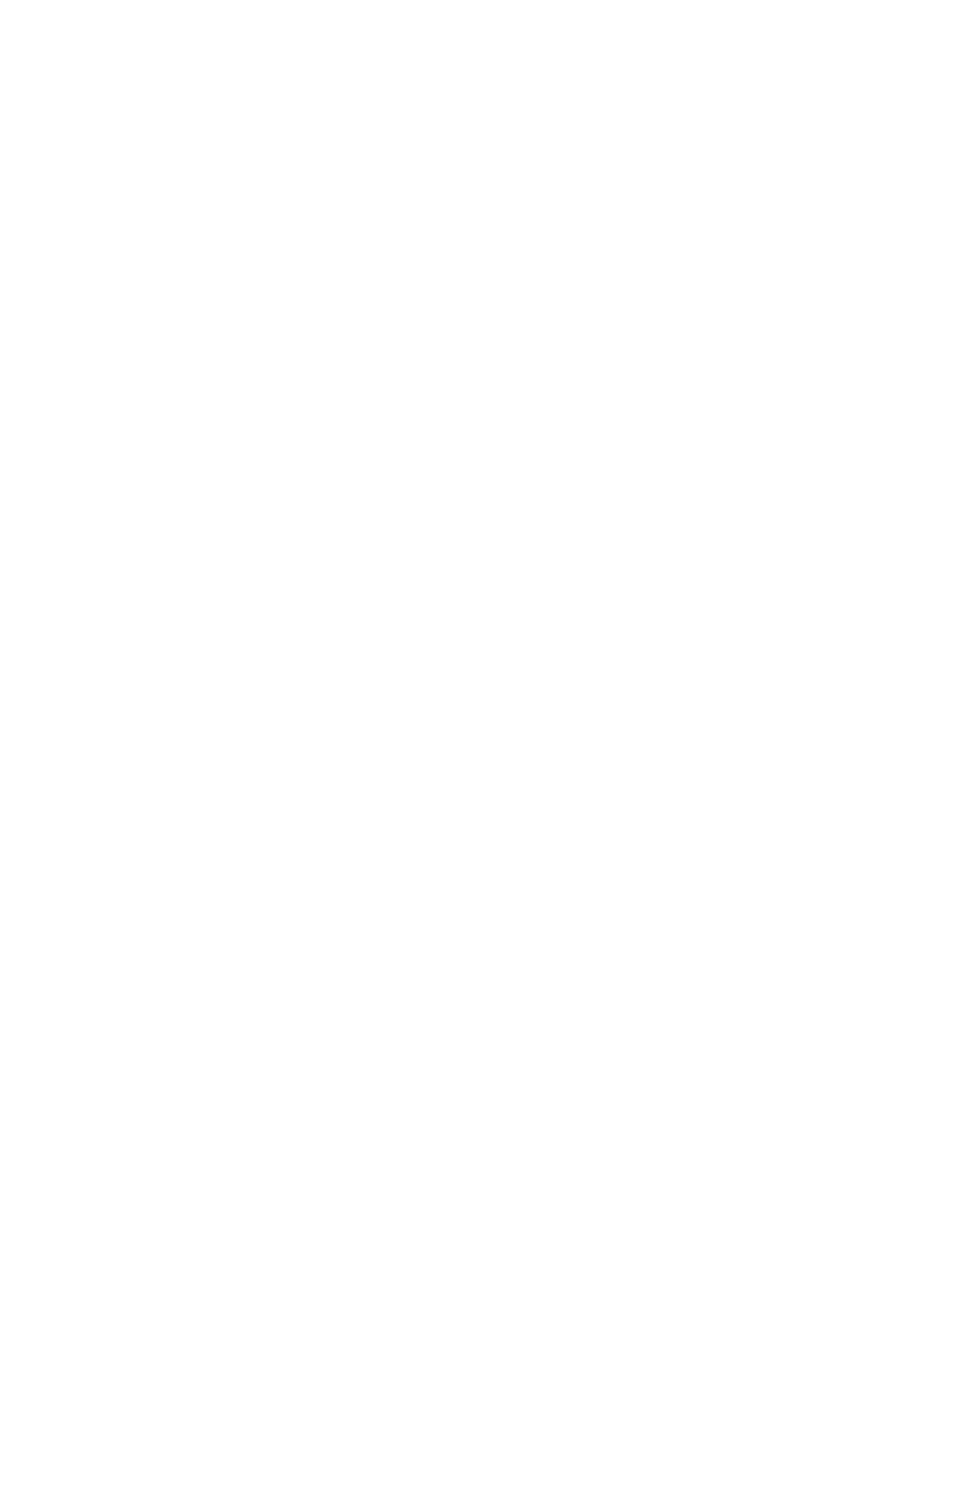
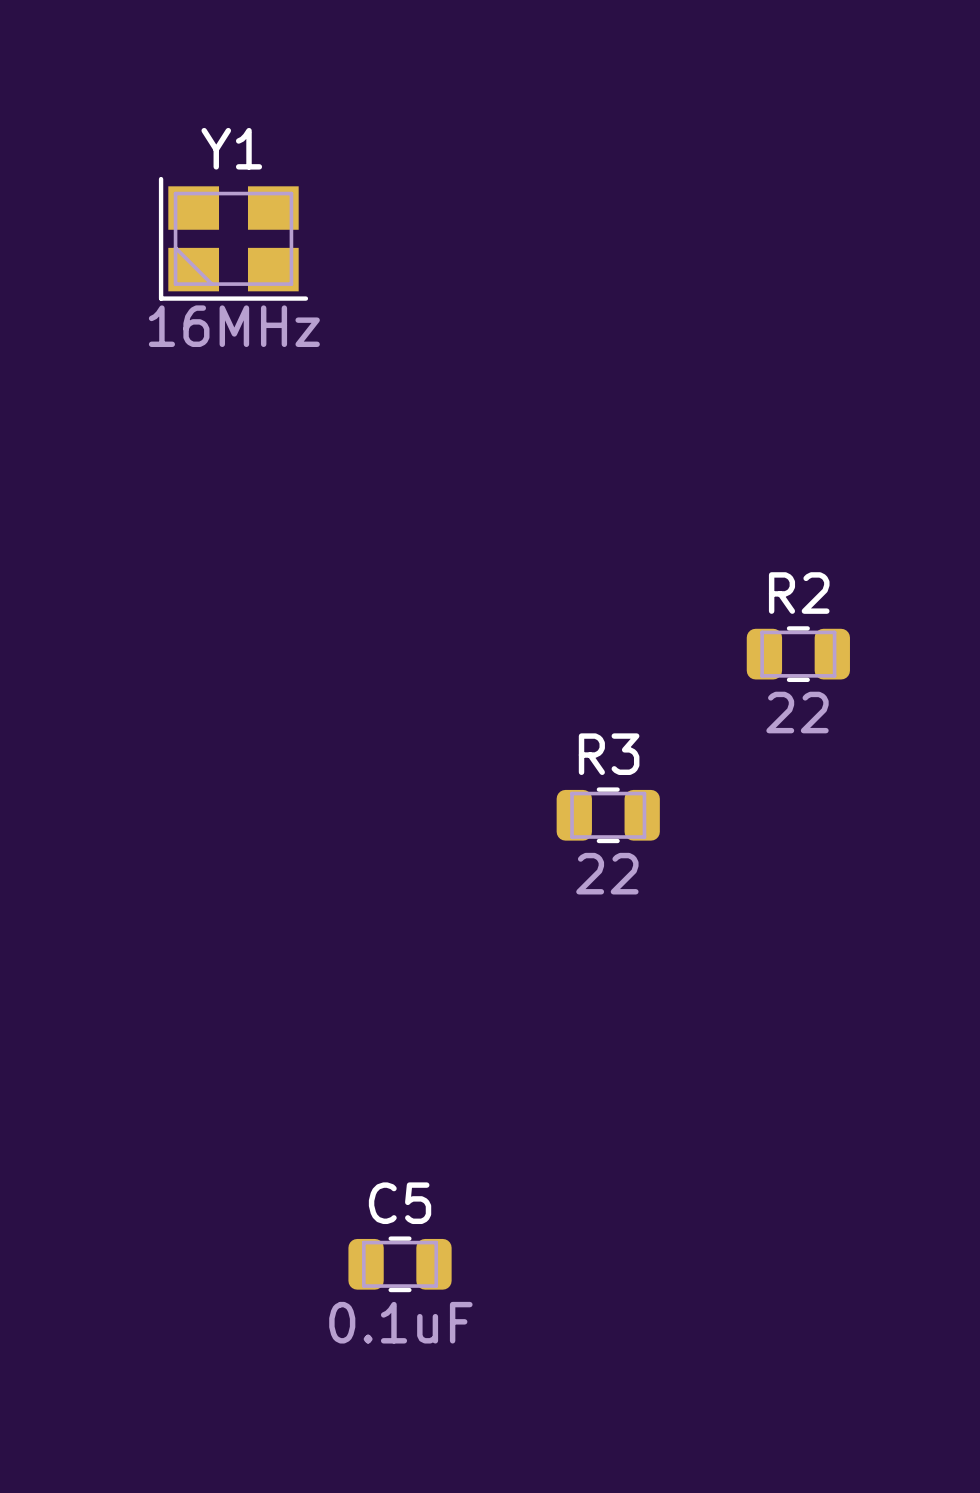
Y1: none -> 16MHz (233, 238)
R2: none -> 22 (798, 654)
R3: none -> 22 (608, 815)
C5: none -> 0.1uF (400, 1264)

